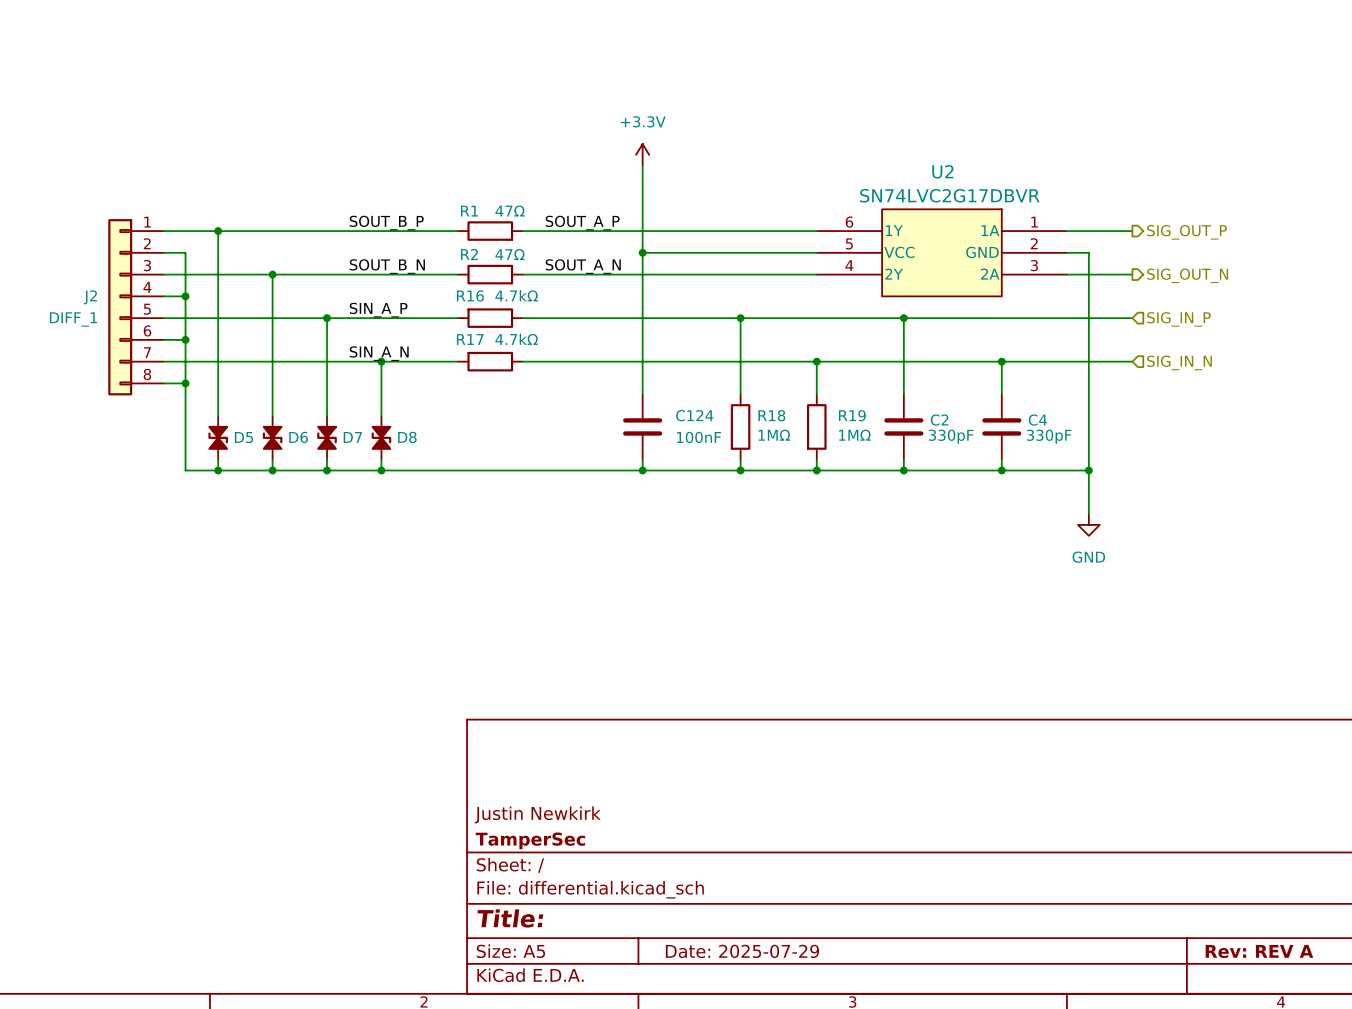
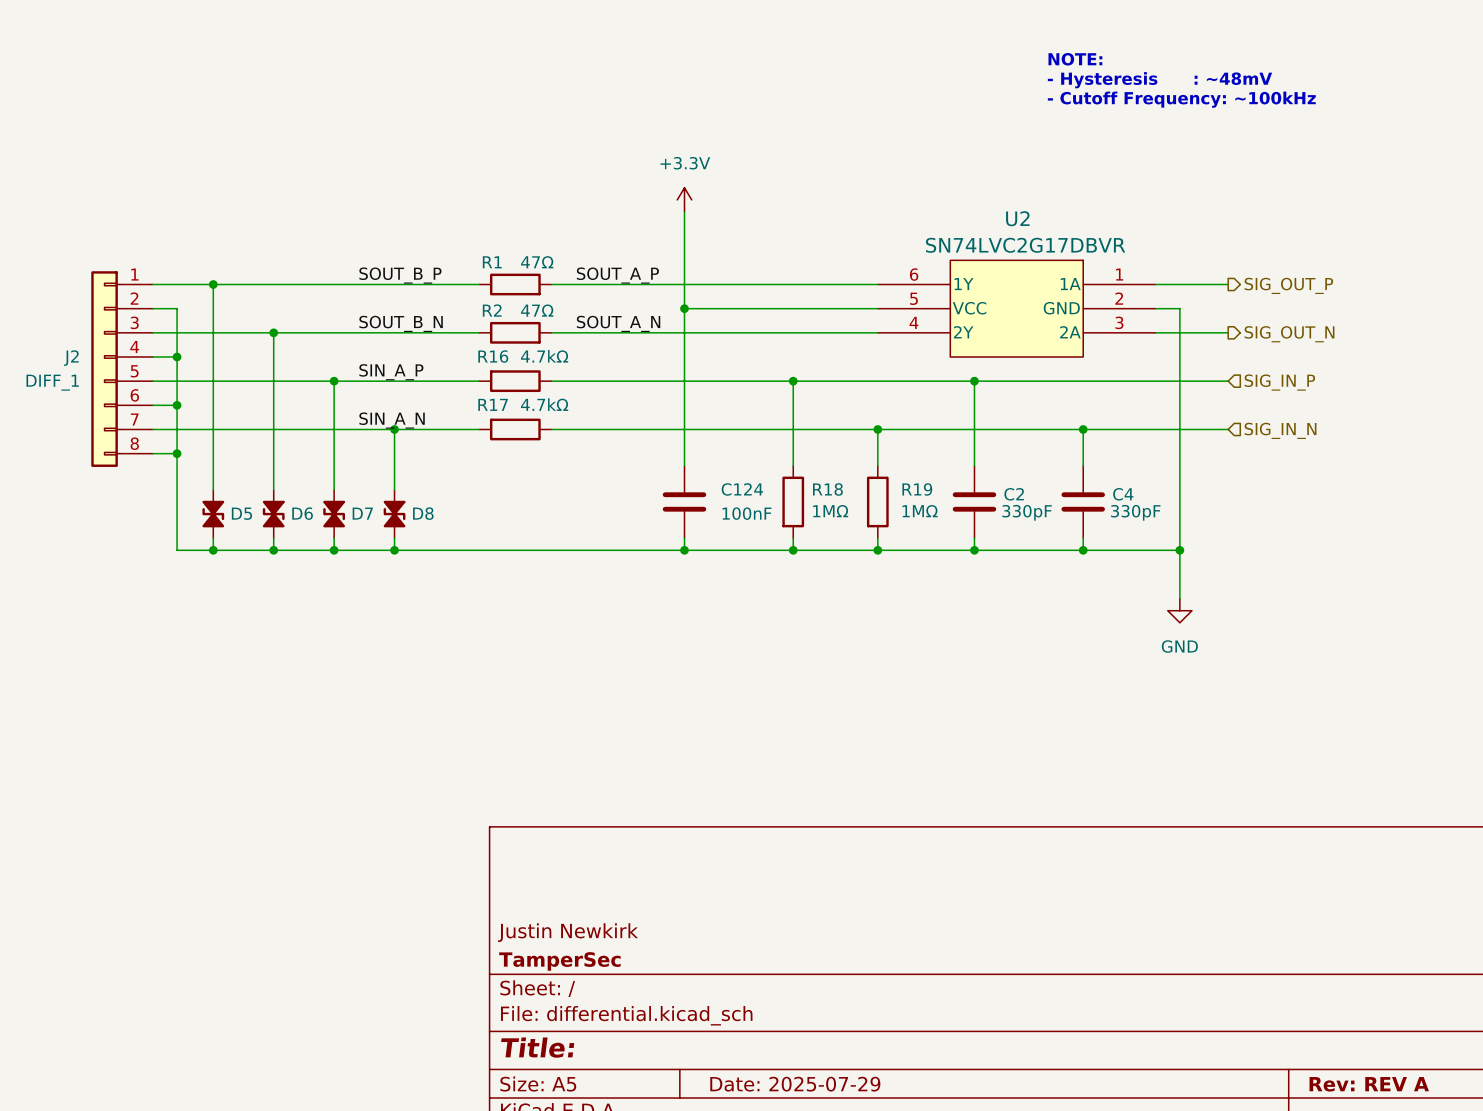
text: none -> NOTE: (1075, 59)
text: none -> - Hysteresis : ~48mV (1159, 80)
text: none -> - Cutoff Frequency: ~100kHz (1181, 99)

